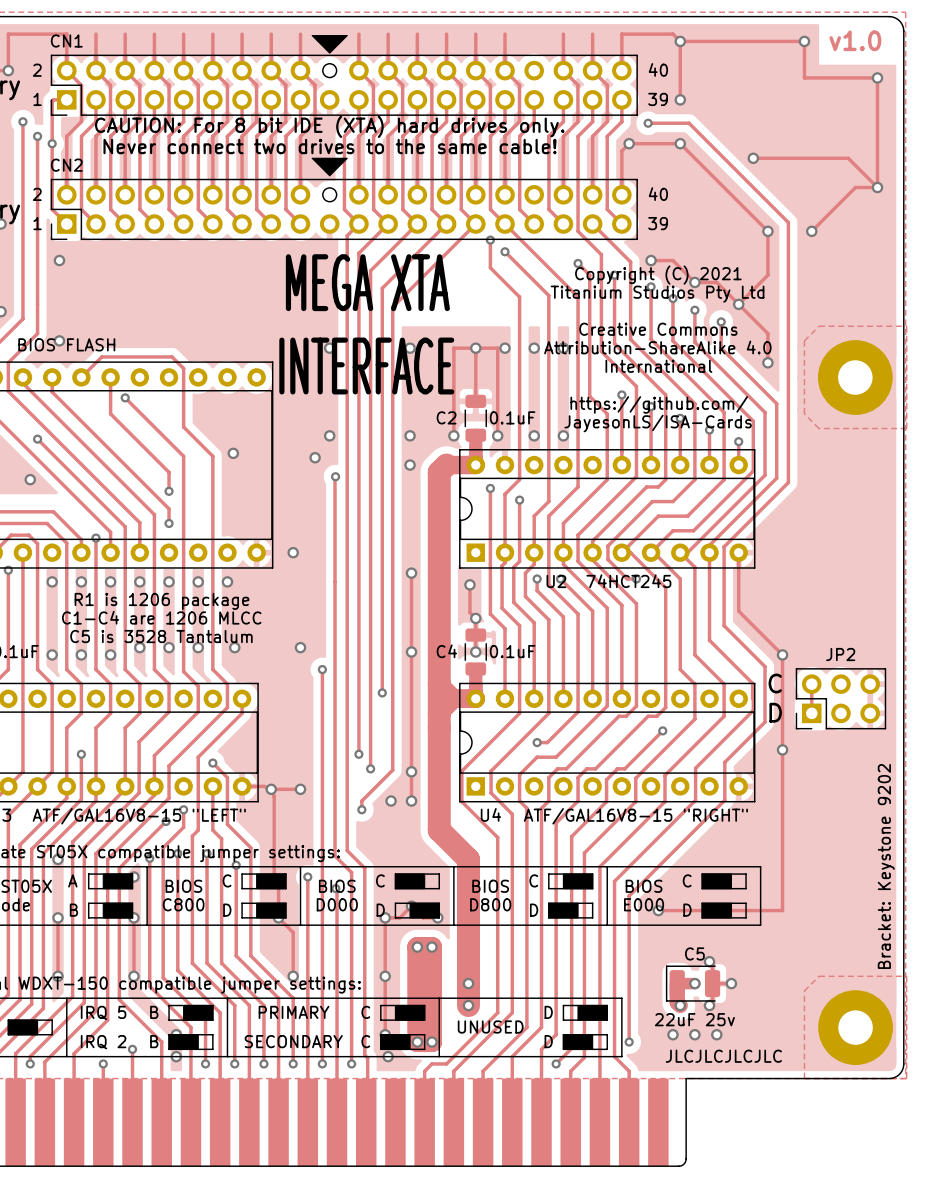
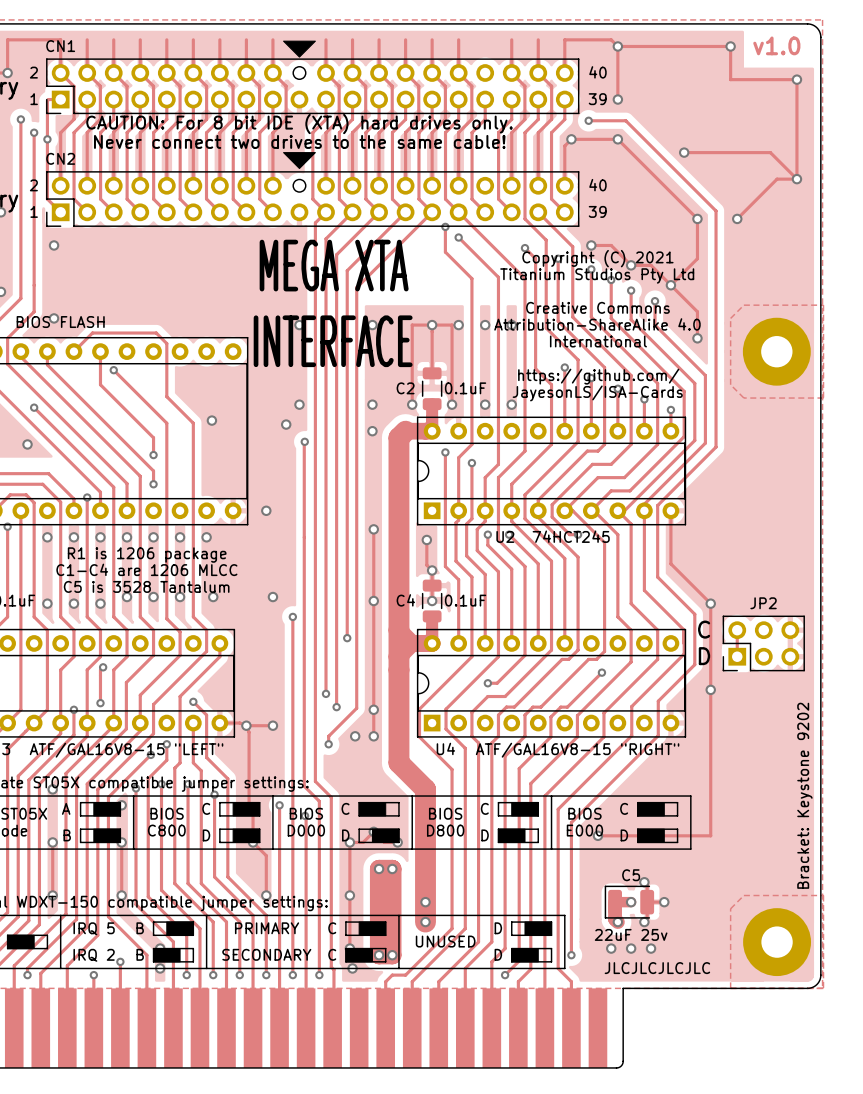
track: none -> (103, 667) (100, 669) (100, 703)
via: none -> (103, 667)
track: (81, 754) (81, 771) -> none
via: (81, 754) -> none
via: none -> (100, 703)
via: none -> (73, 709)

